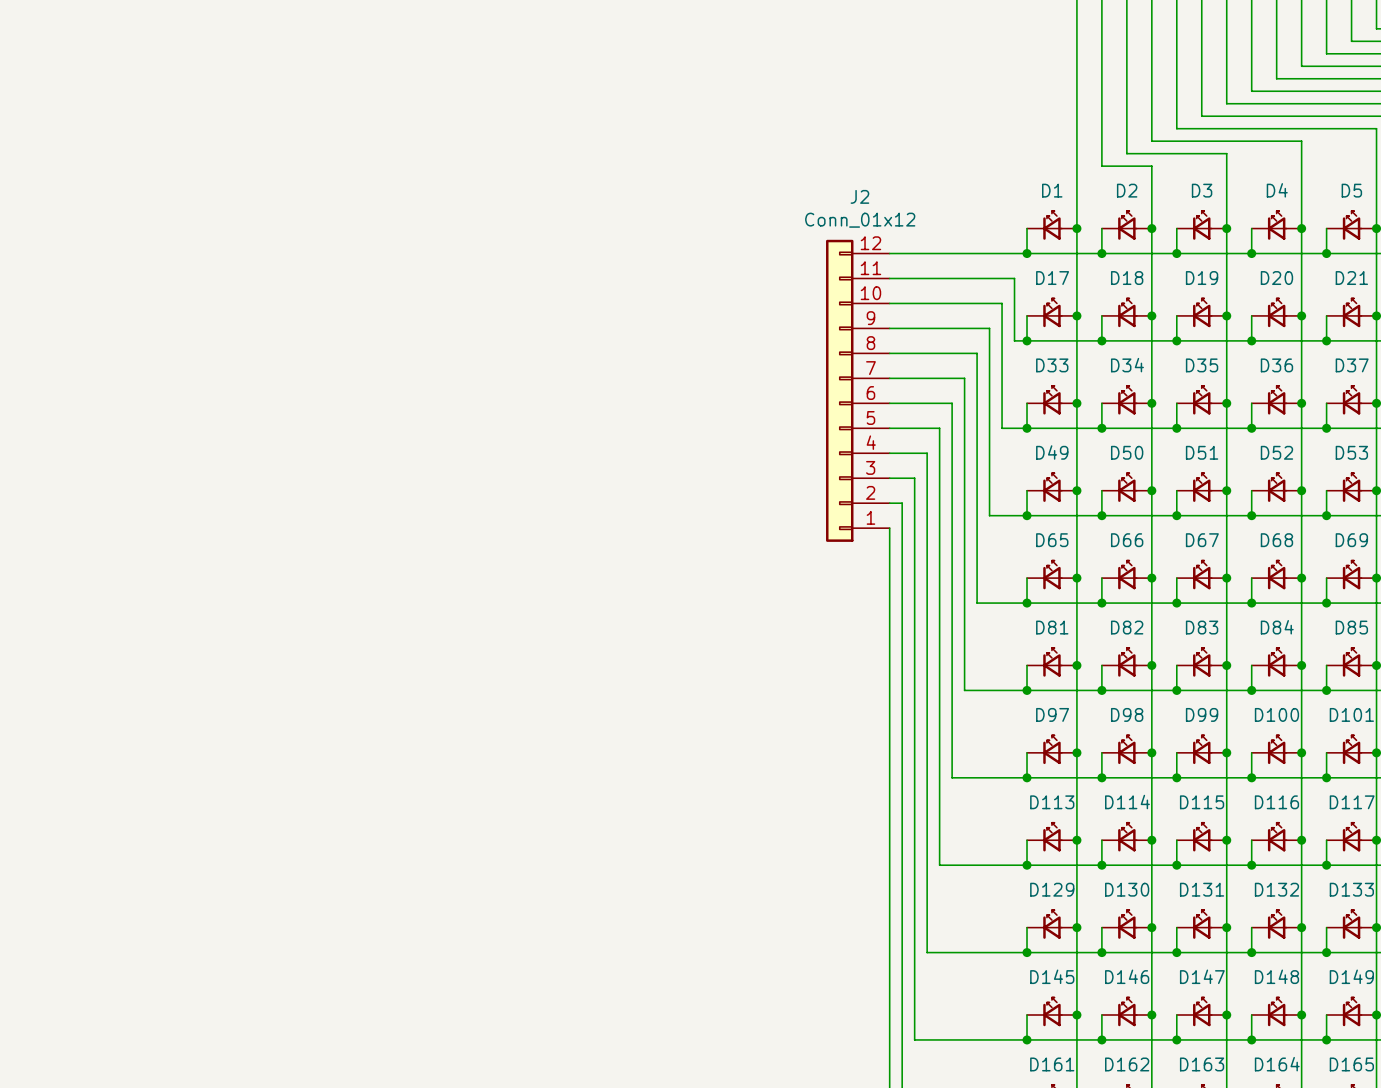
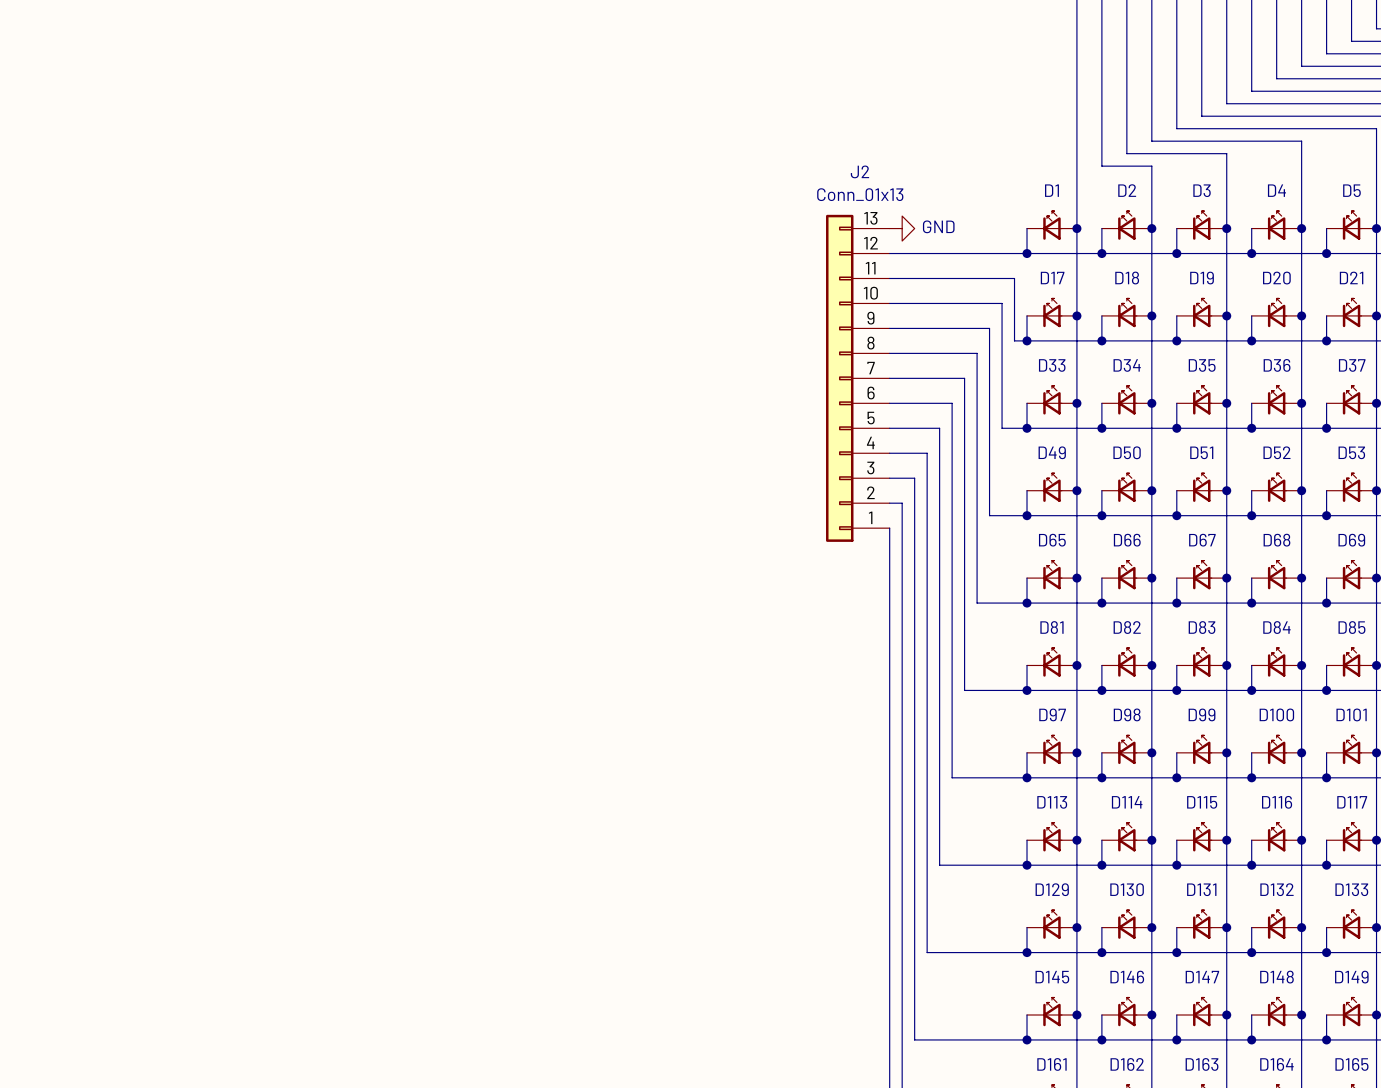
J2 value: Conn_01x12 (860, 220) -> Conn_01x13 (860, 194)
power symbol: none -> GND (902, 228)
J2 symbol: [826, 239, 890, 542] -> [826, 214, 890, 542]

